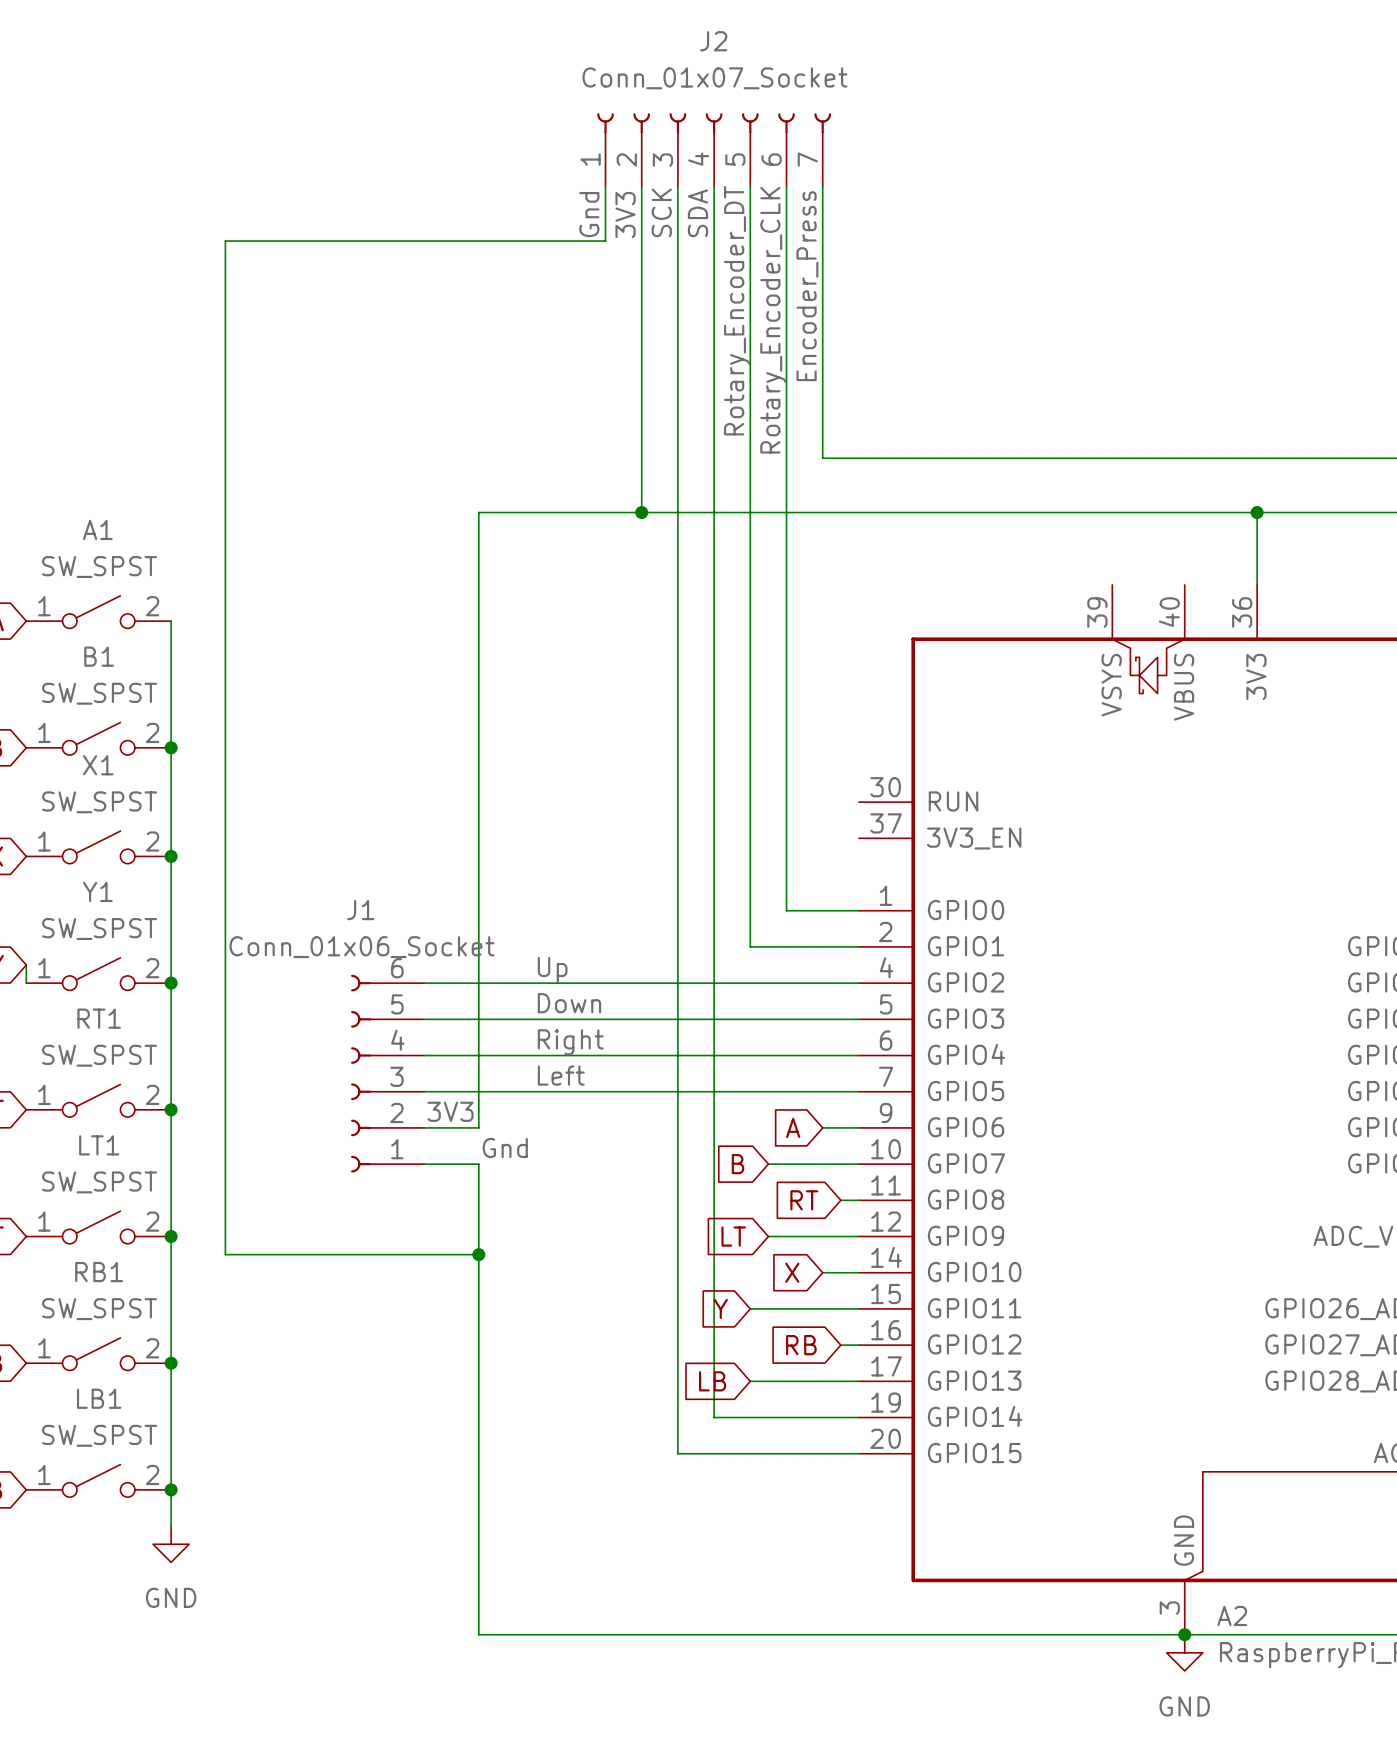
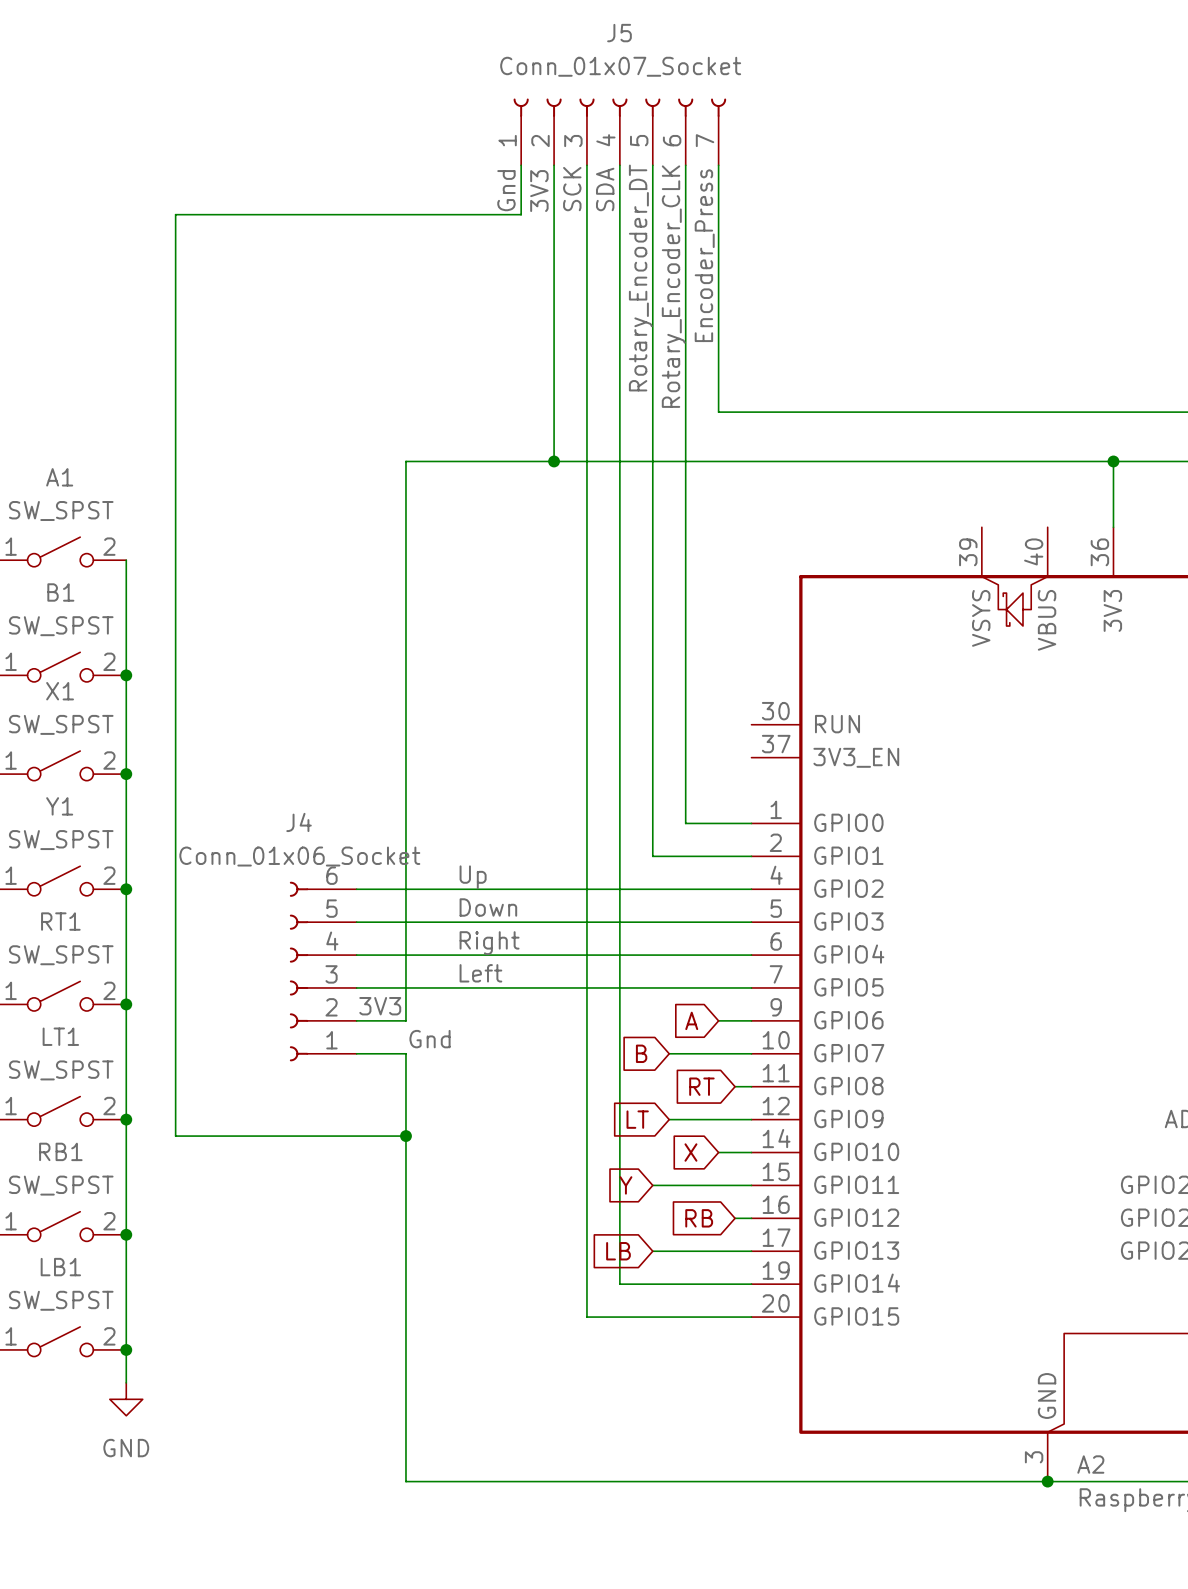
J2 name: J2 (713, 41) -> J5 (619, 33)
J1 name: J1 (360, 910) -> J4 (299, 822)
power symbol: GND (1184, 1652) -> none

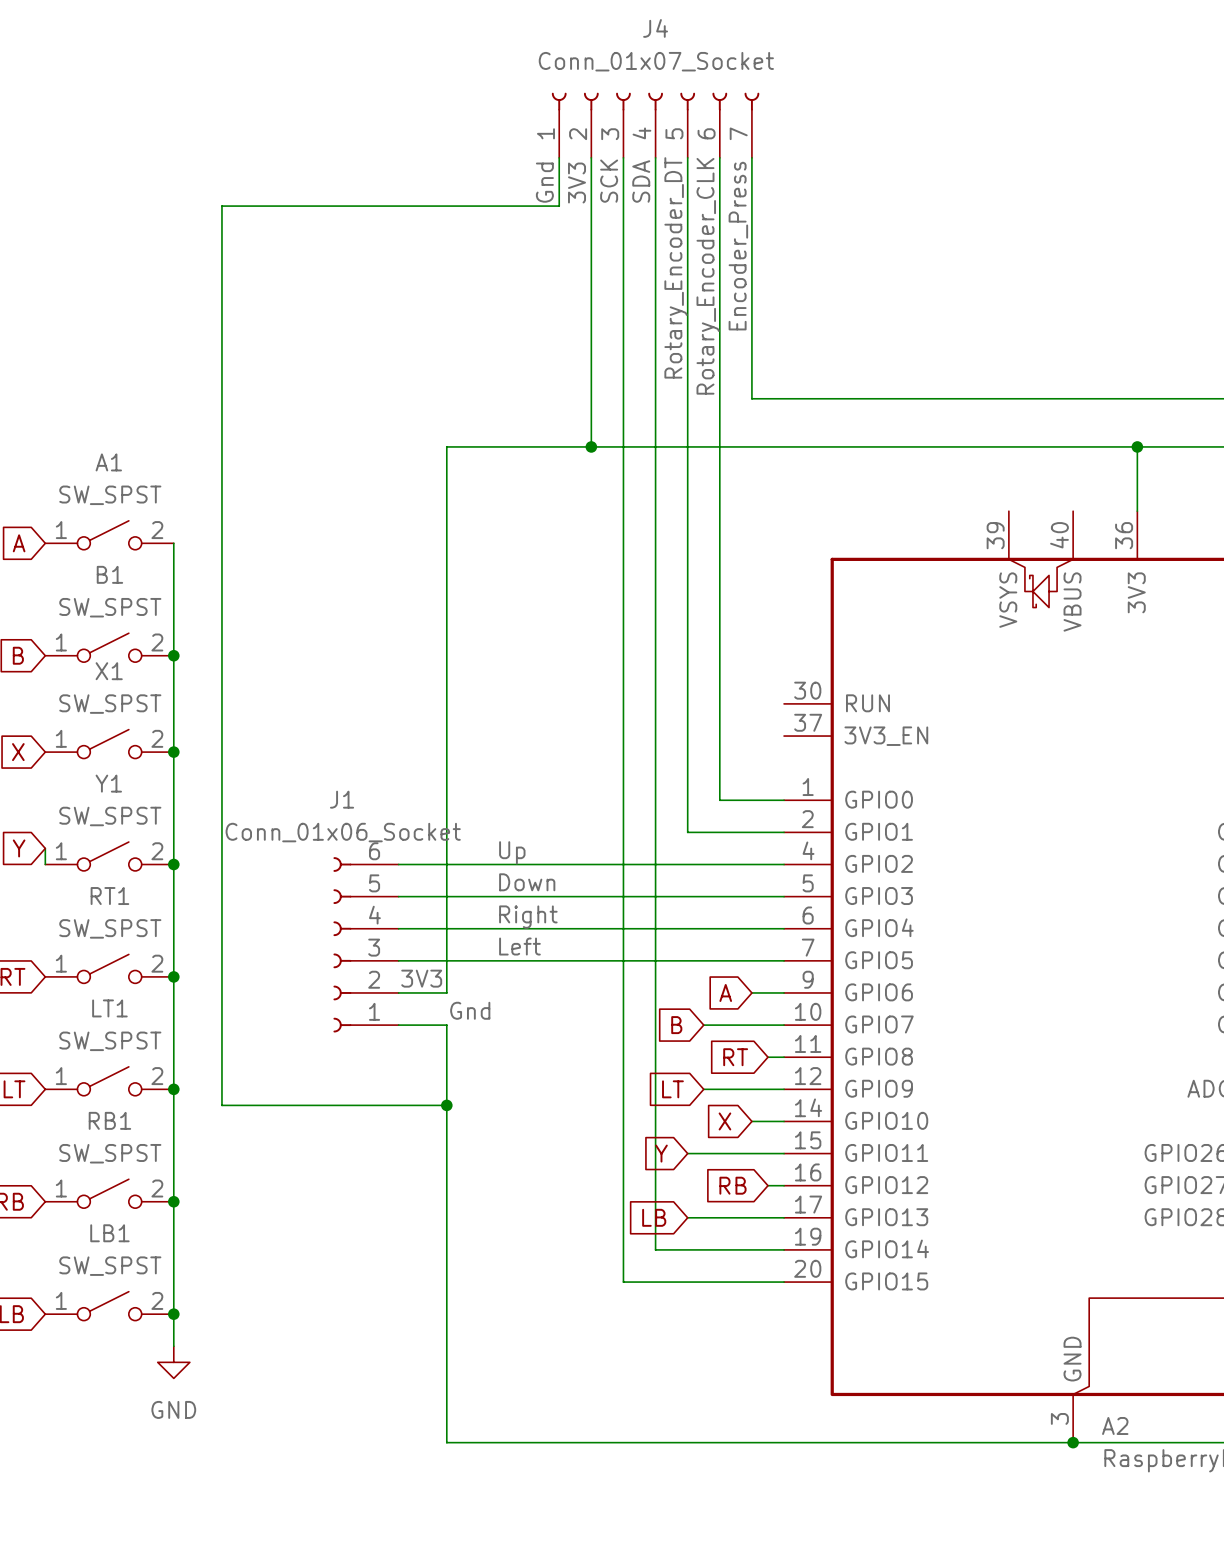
J5 name: J5 (619, 33) -> J4 (655, 28)
J4 name: J4 (299, 822) -> J1 (342, 799)

